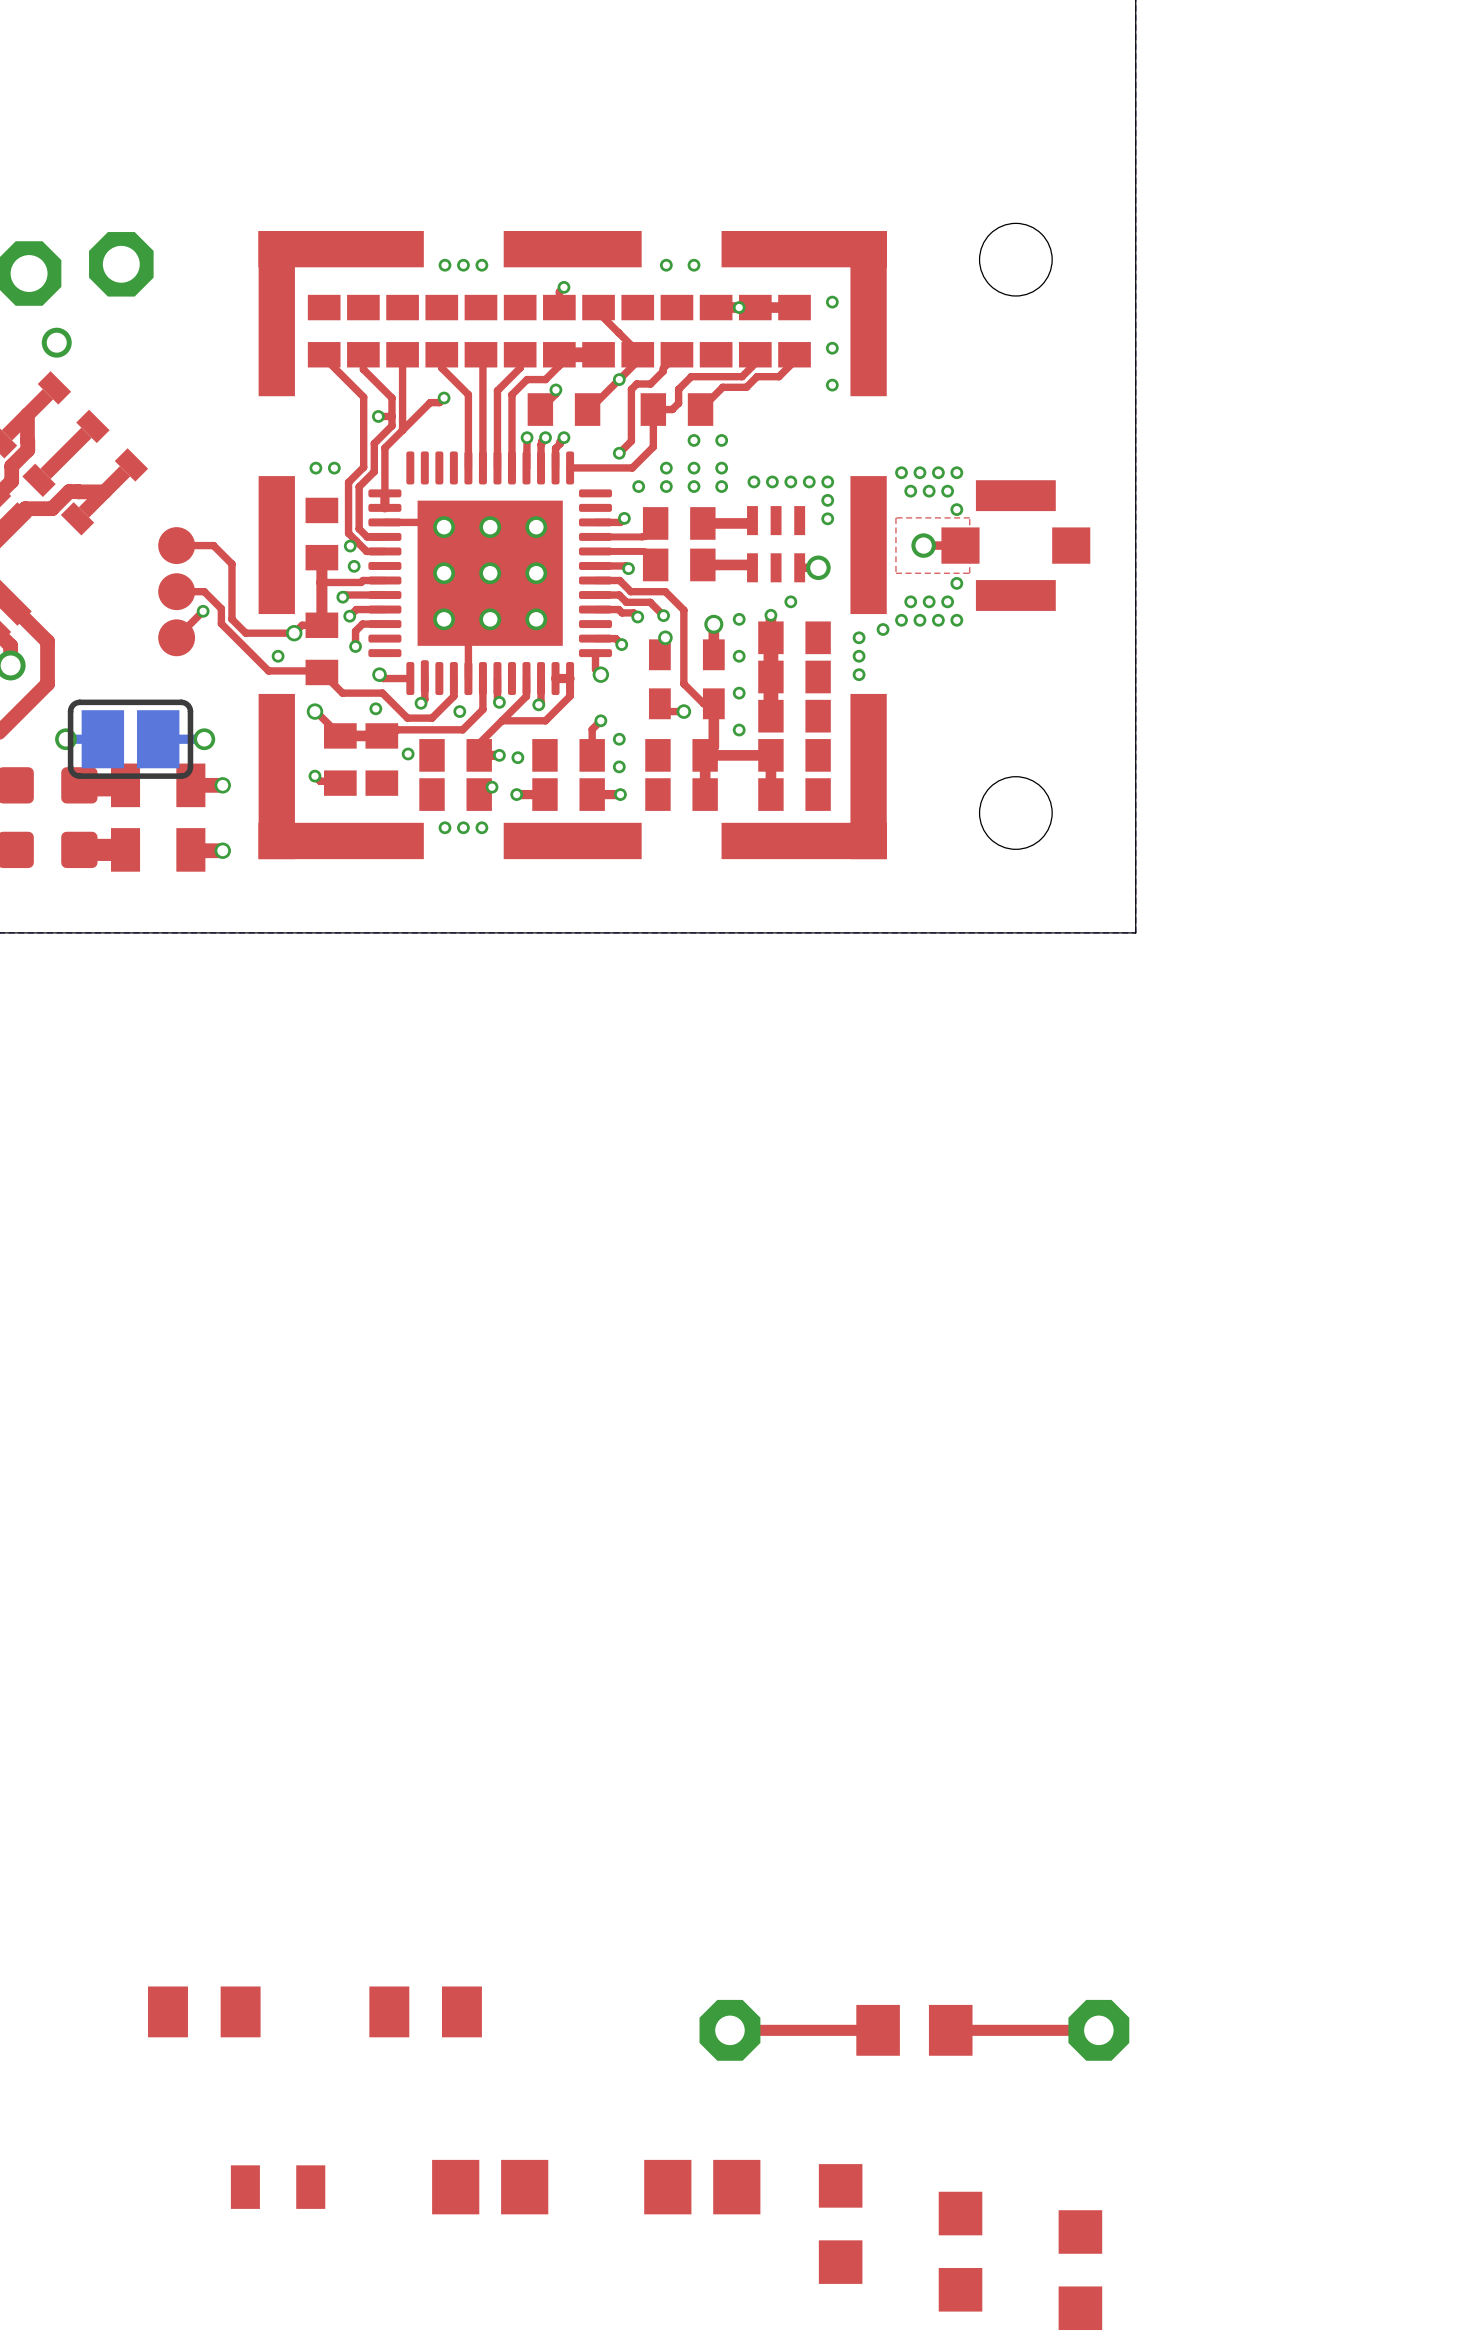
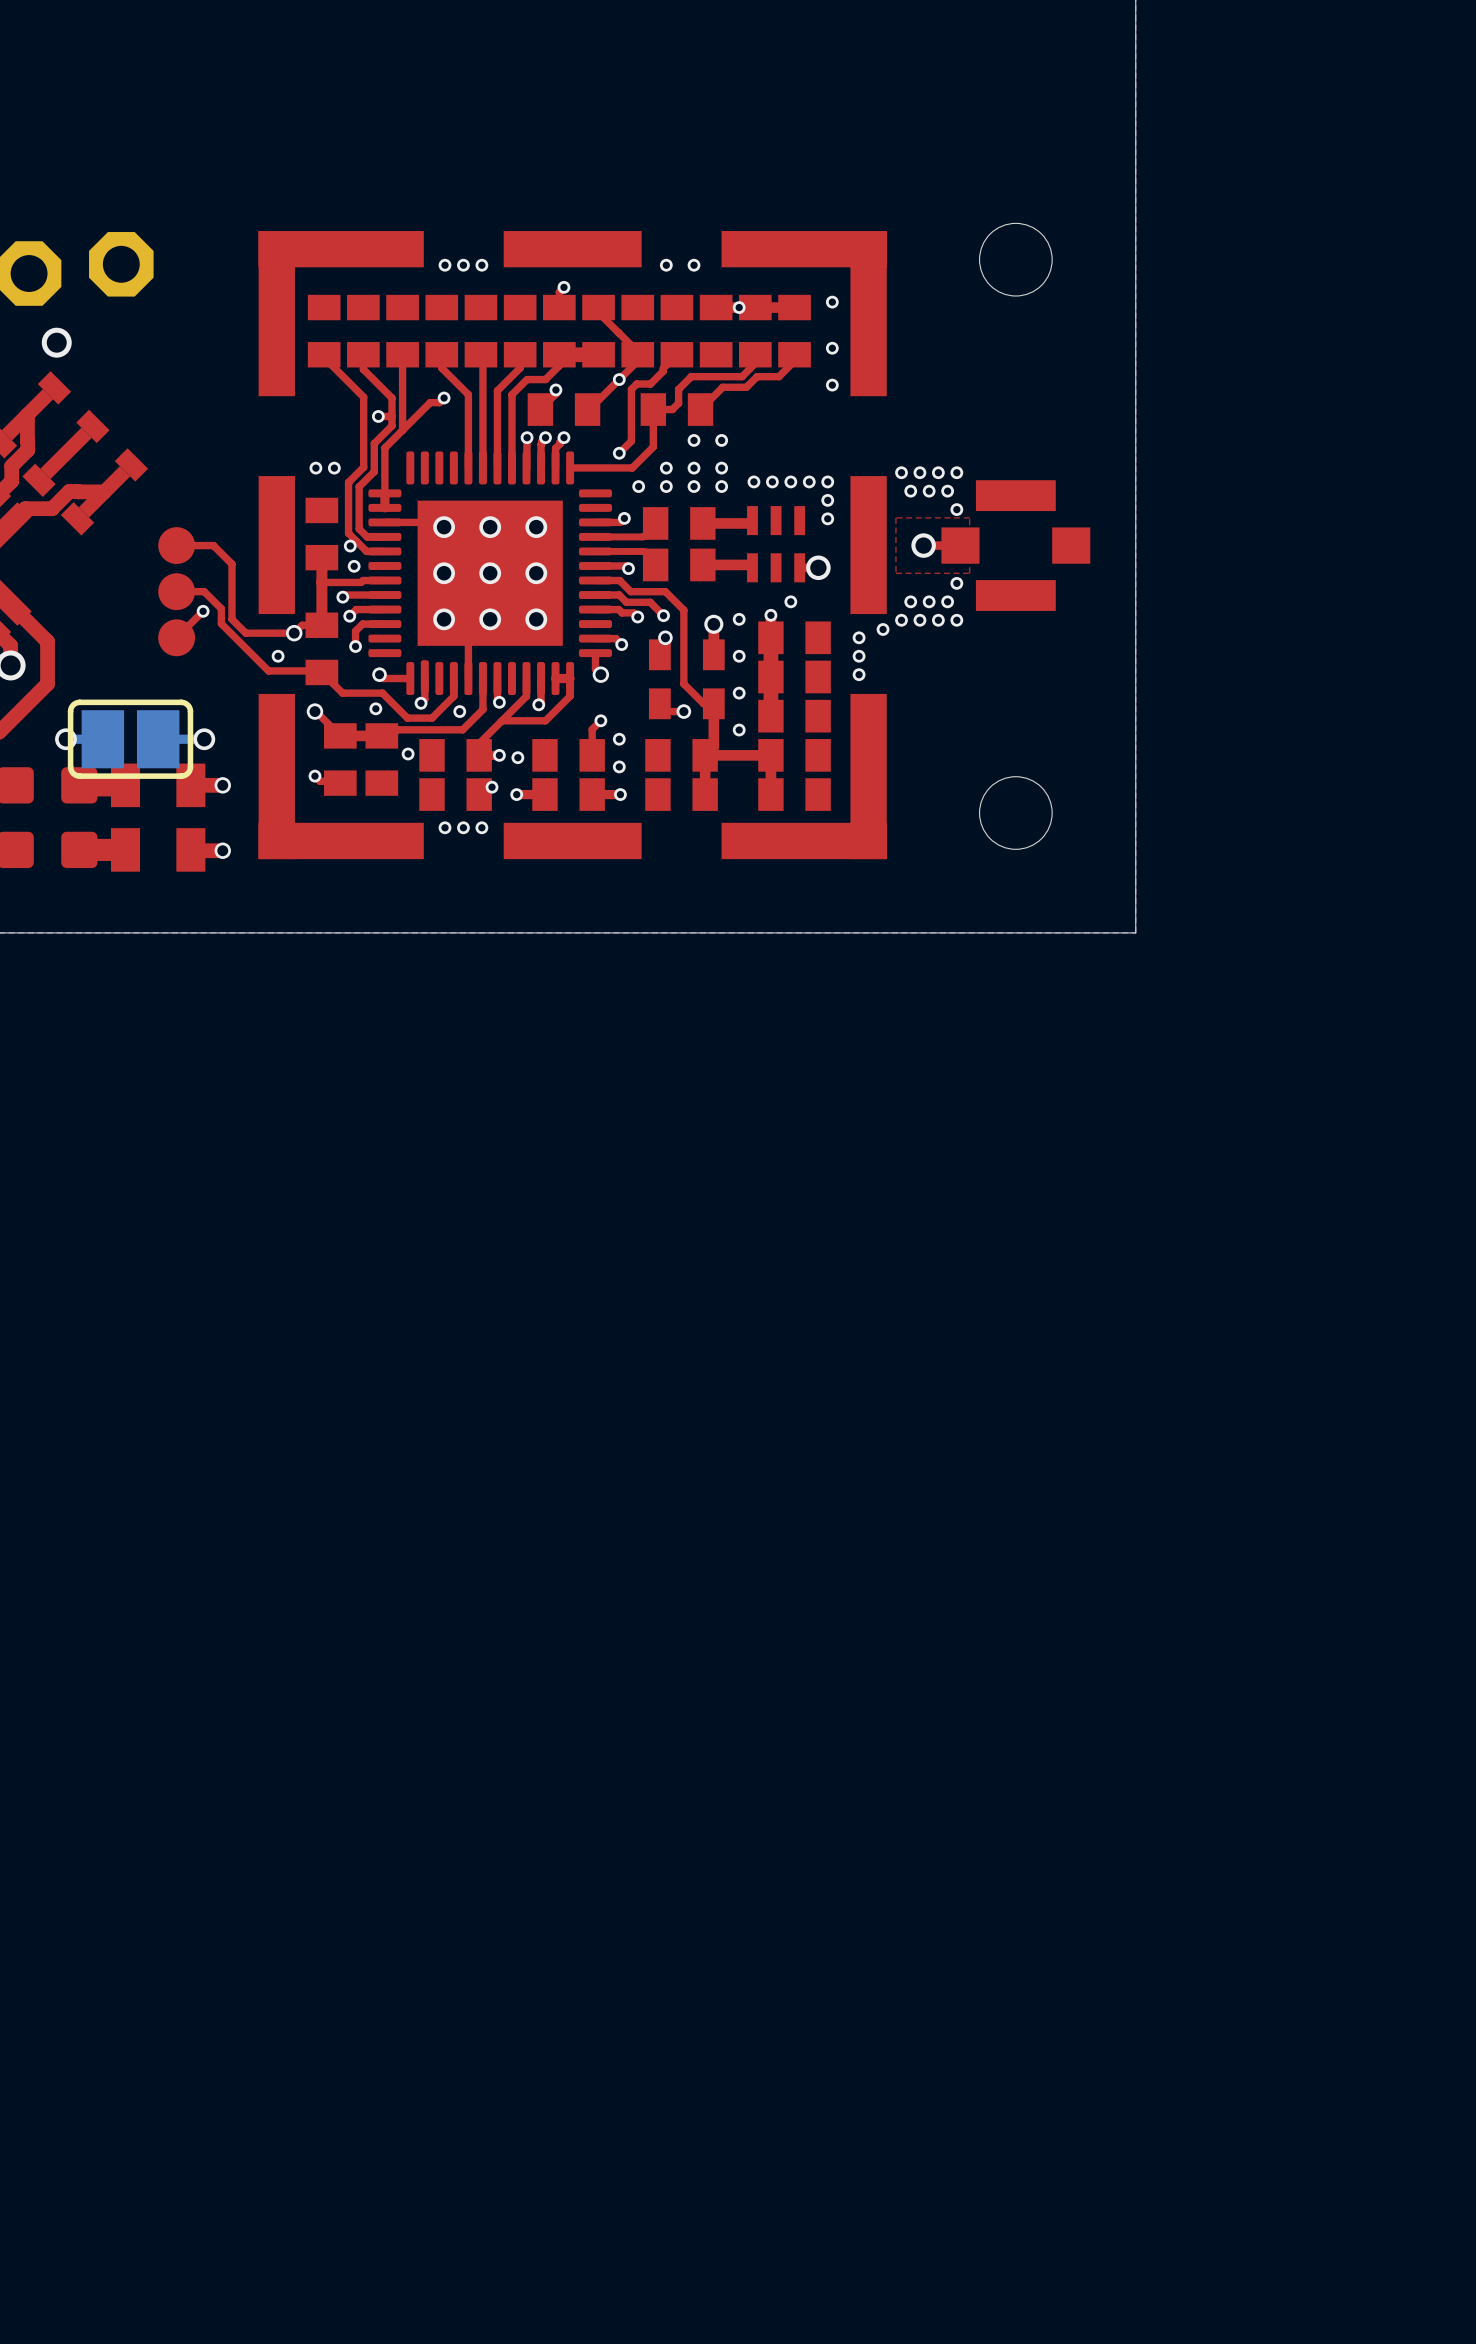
part: (204, 2011) -> none
part: (425, 2011) -> none
part: (914, 2030) -> none
part: (278, 2187) -> none
part: (490, 2187) -> none
part: (702, 2187) -> none
part: (840, 2224) -> none
part: (960, 2251) -> none
part: (1080, 2270) -> none

